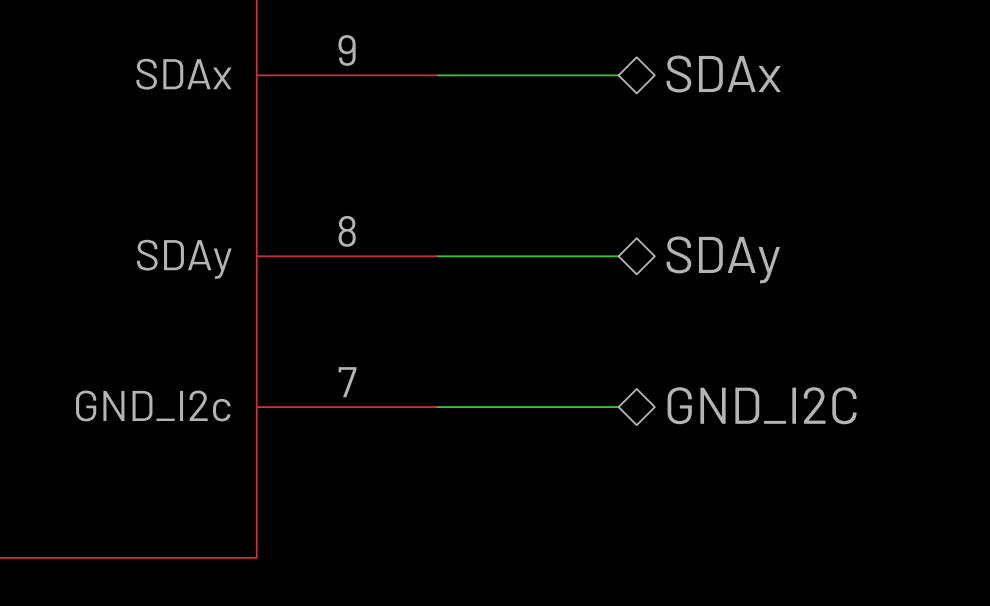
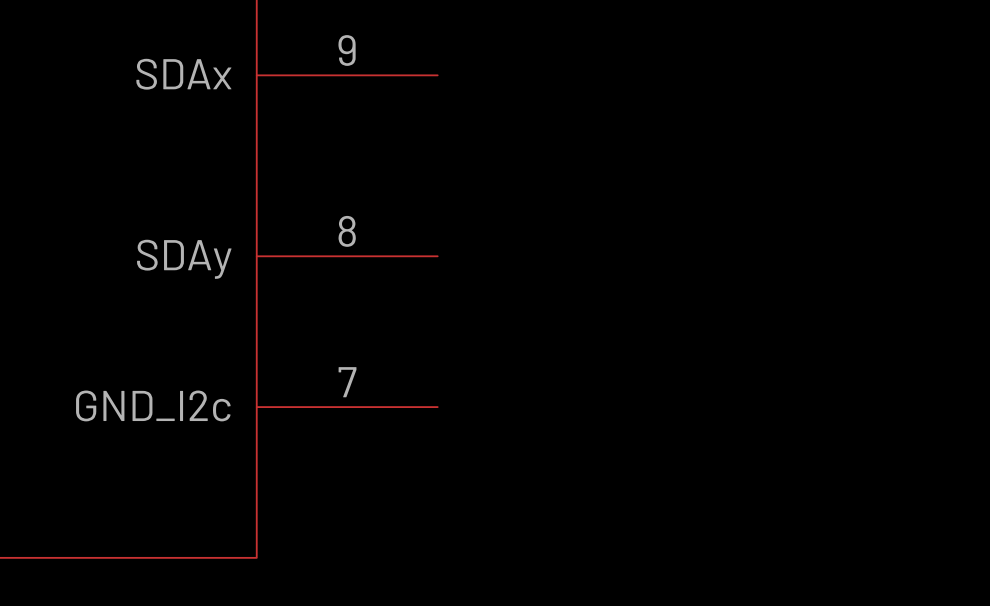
hierarchical label: SDAx (723, 73) -> none
wire: (437, 75) (618, 75) -> none
wire: (437, 256) (618, 256) -> none
hierarchical label: SDAy (723, 259) -> none
hierarchical label: GND_I2C (762, 405) -> none
wire: (437, 407) (618, 407) -> none

